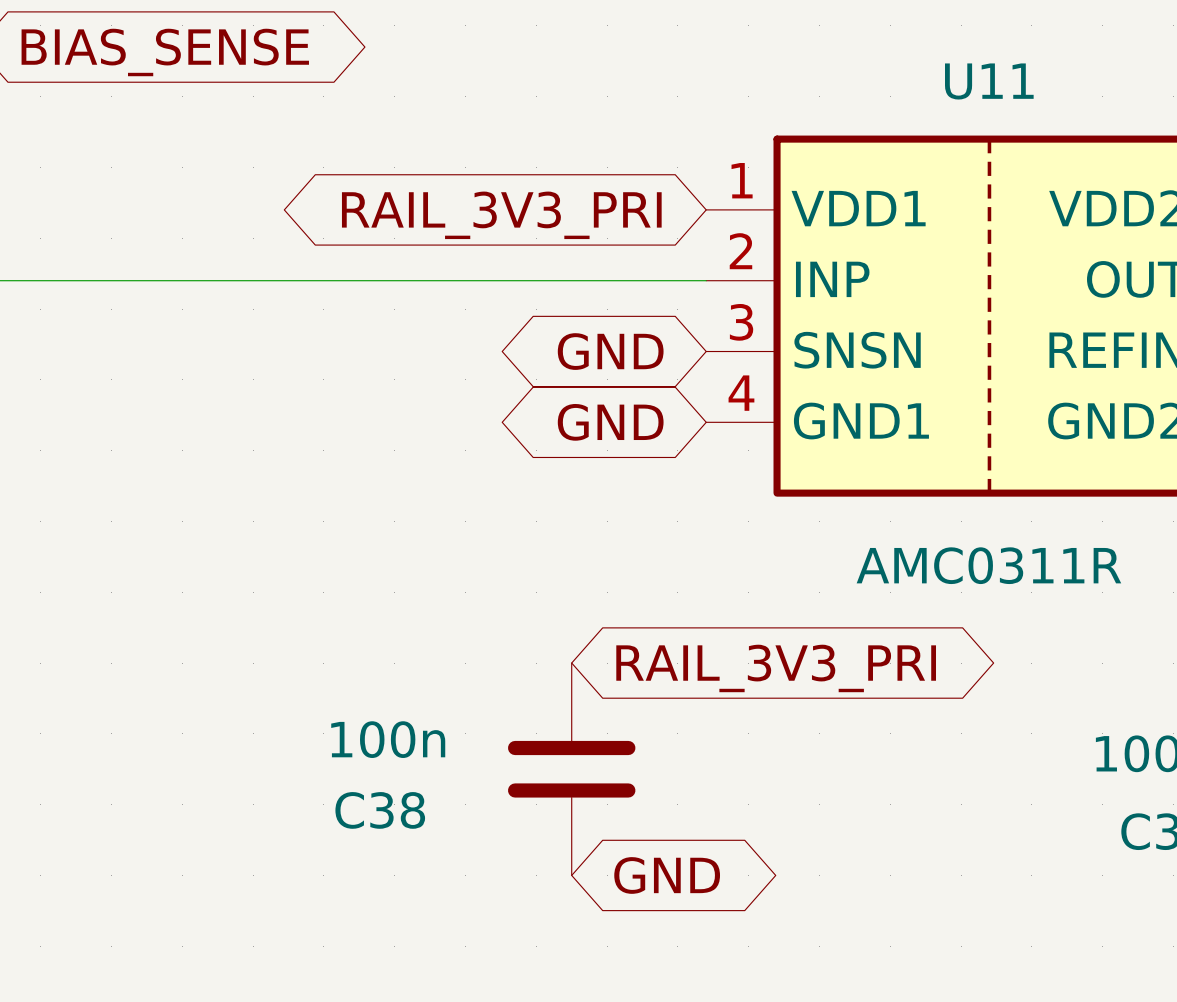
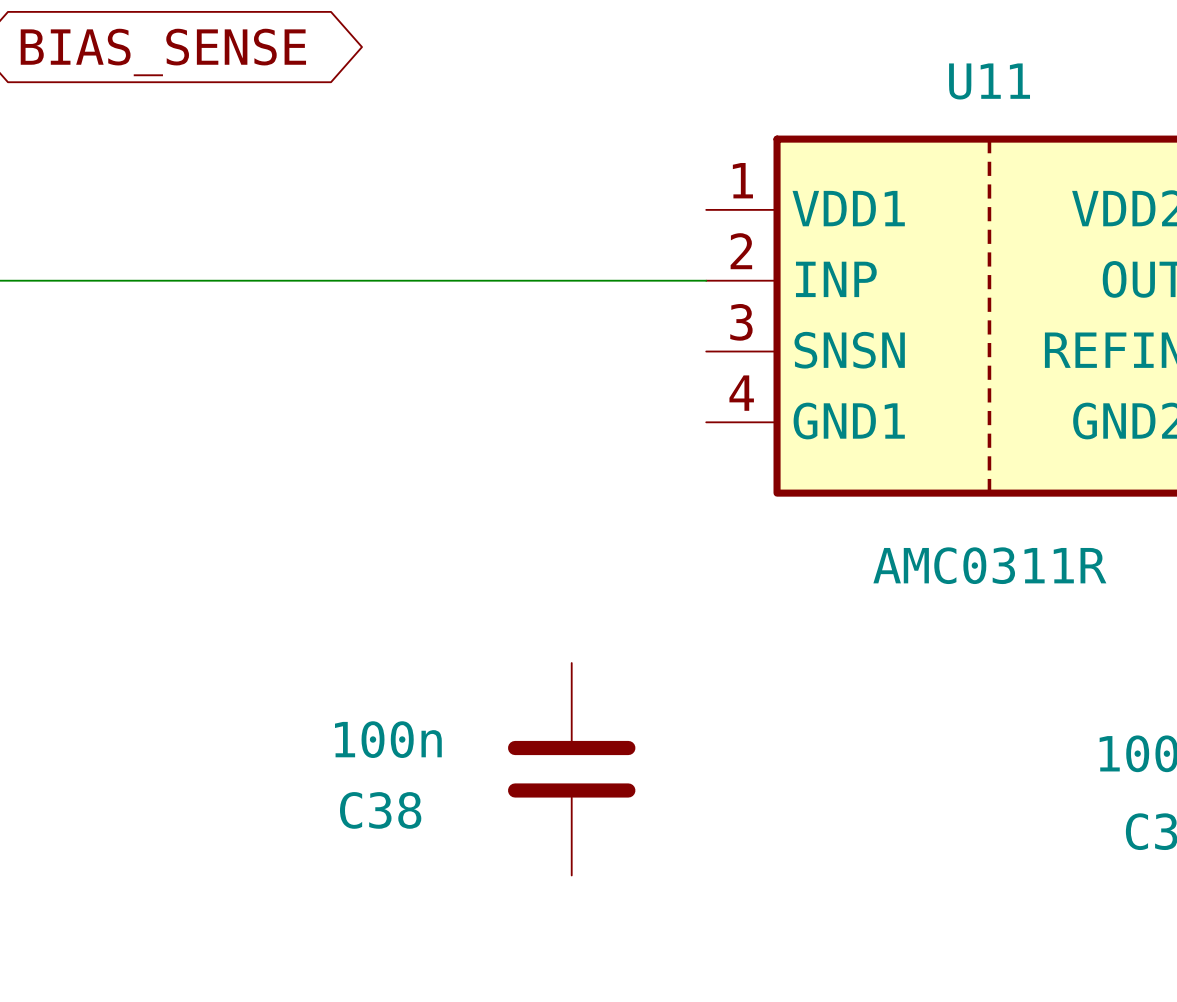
global label: RAIL_3V3_PRI (501, 215) -> none
global label: GND (610, 351) -> none
global label: GND (610, 422) -> none
global label: RAIL_3V3_PRI (776, 668) -> none
global label: GND (667, 875) -> none

